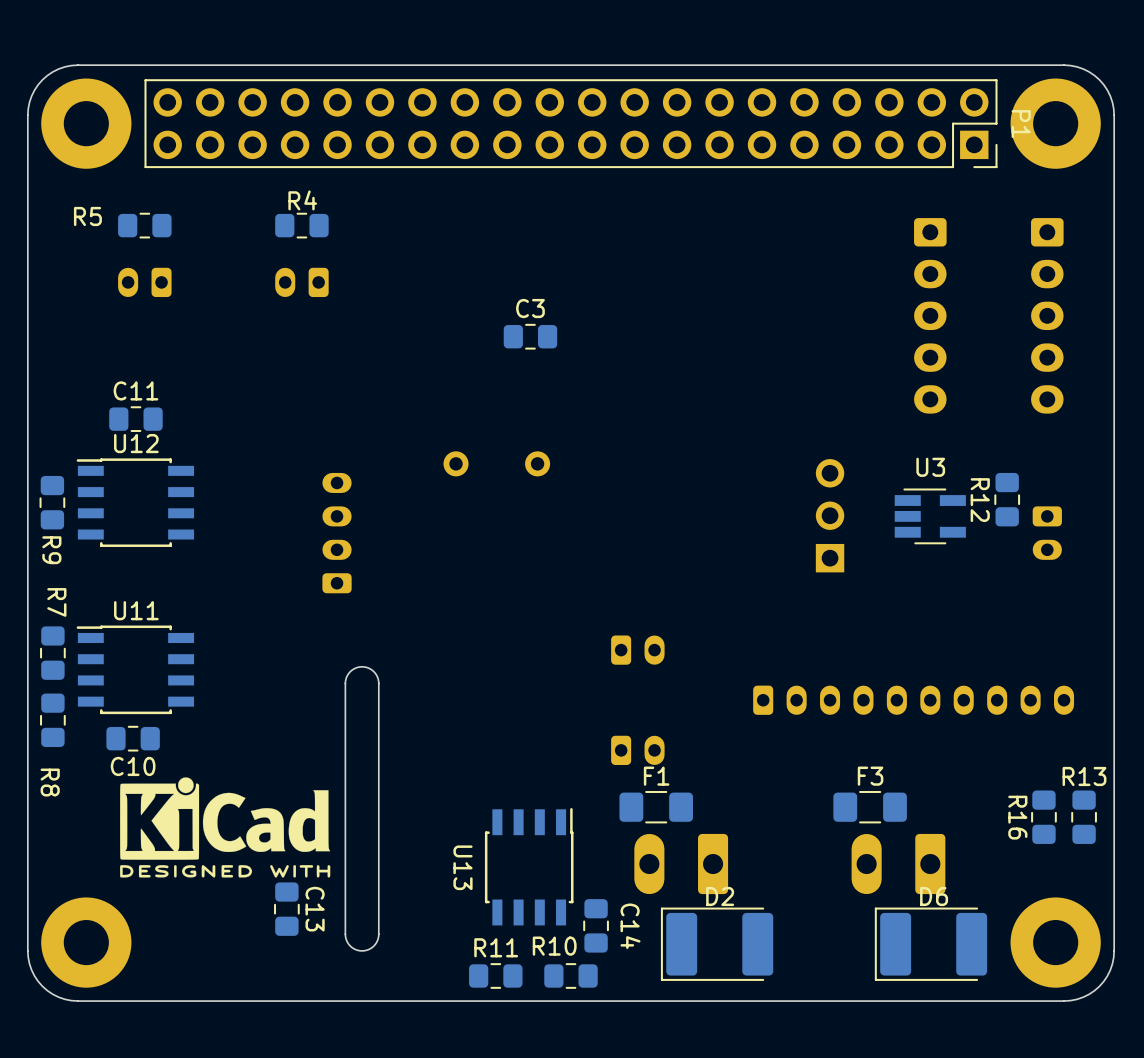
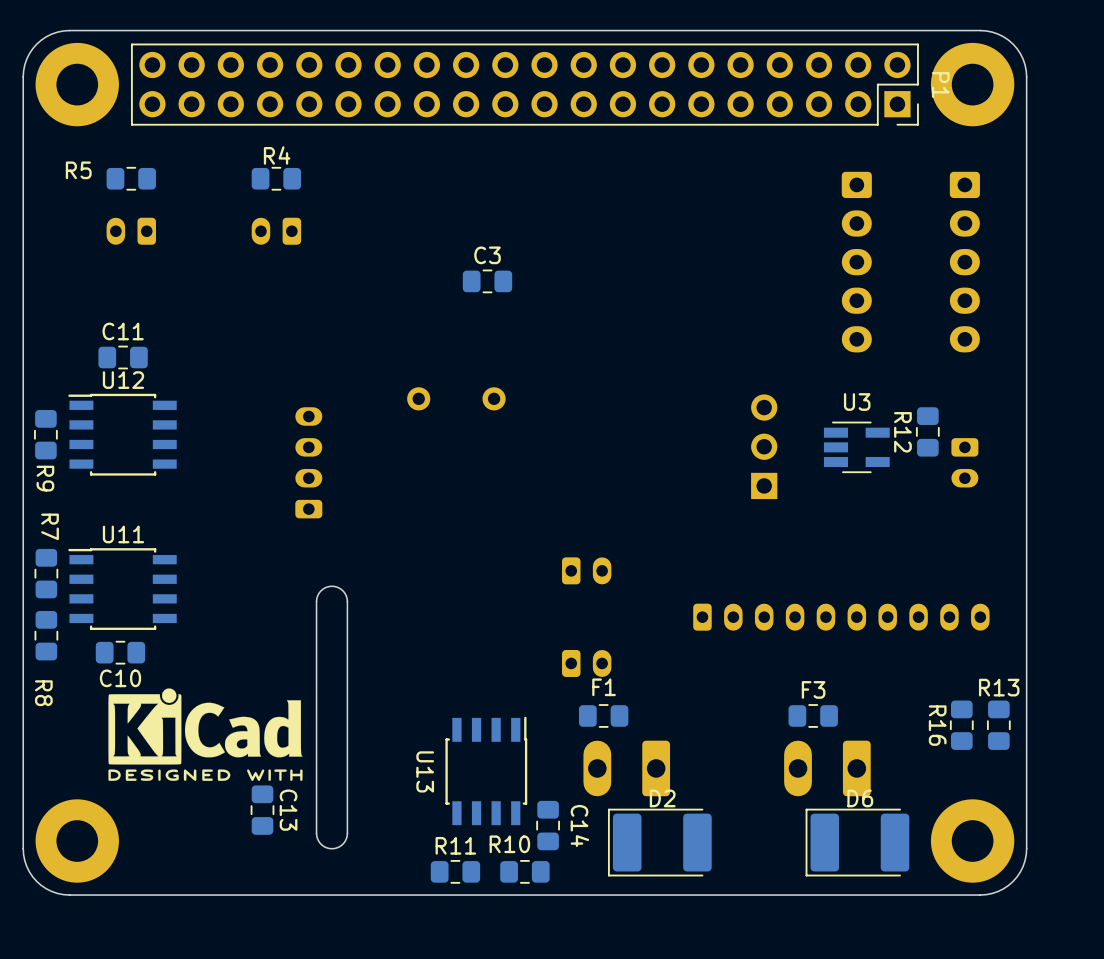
F1 footprint: [619, 790, 694, 824] -> [578, 704, 629, 728]
F3 footprint: [833, 790, 907, 824] -> [788, 704, 838, 728]

